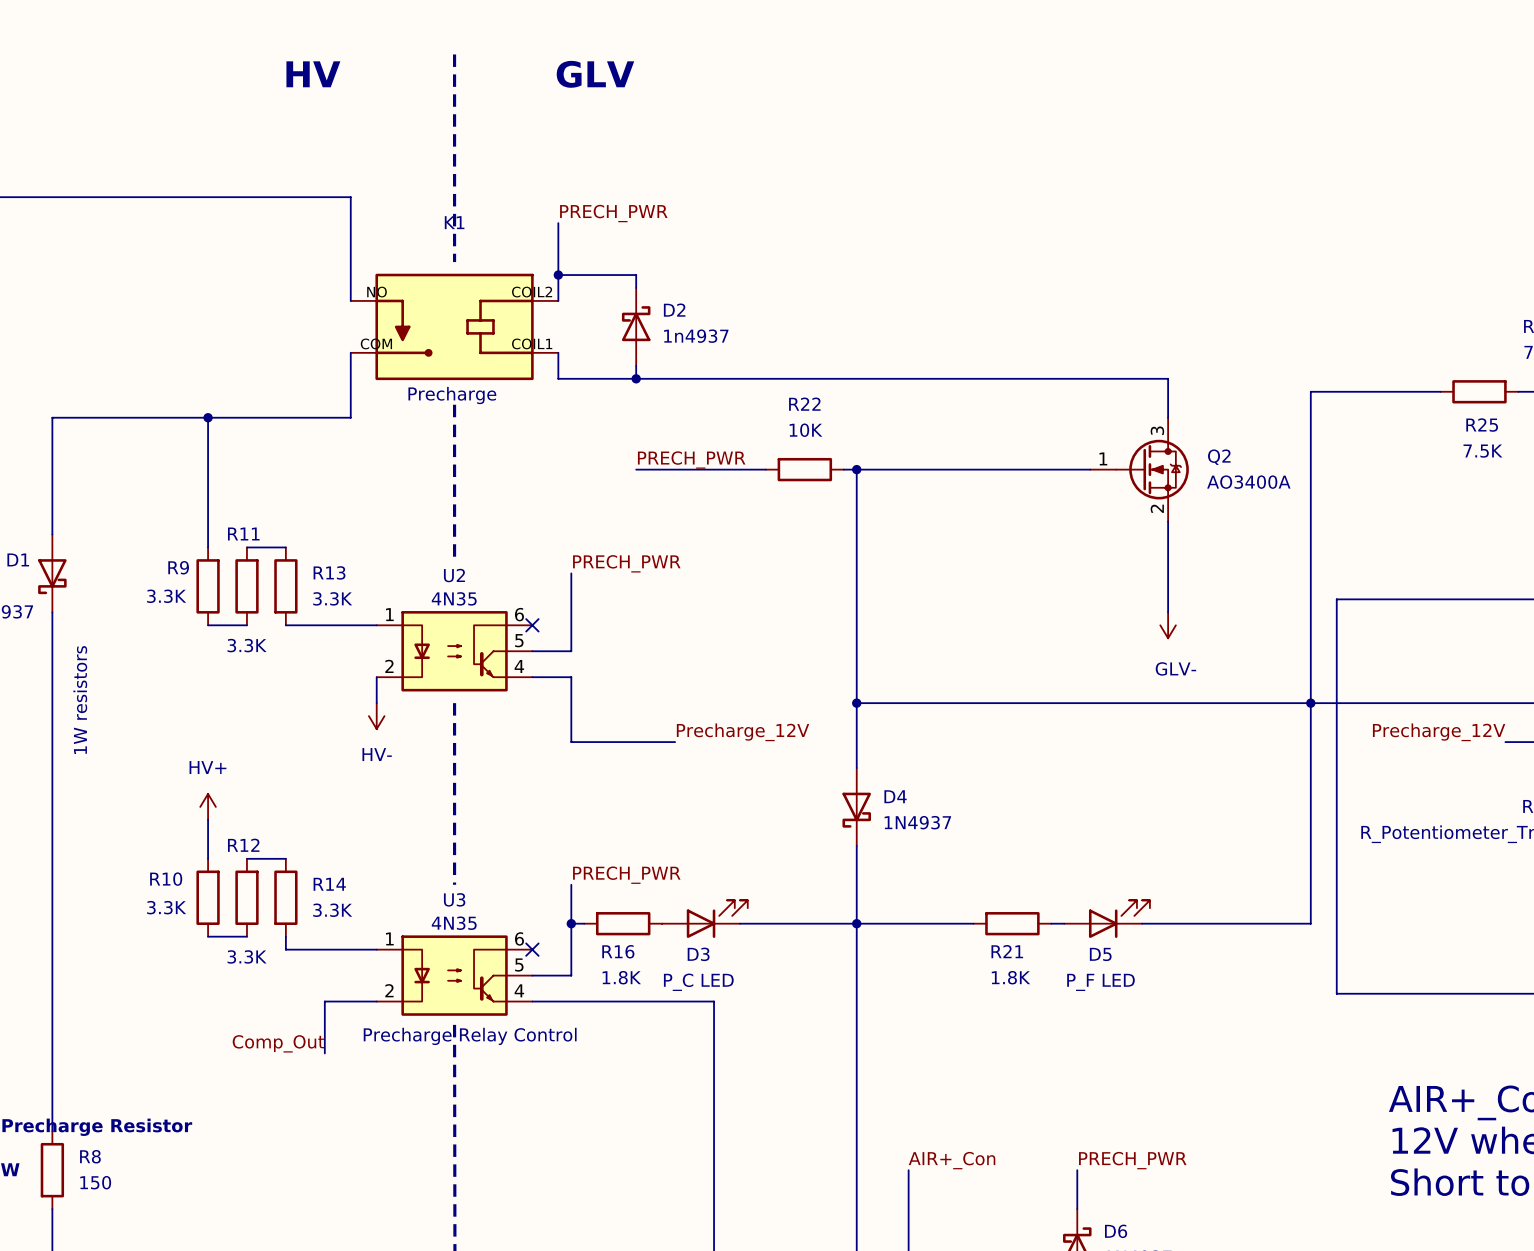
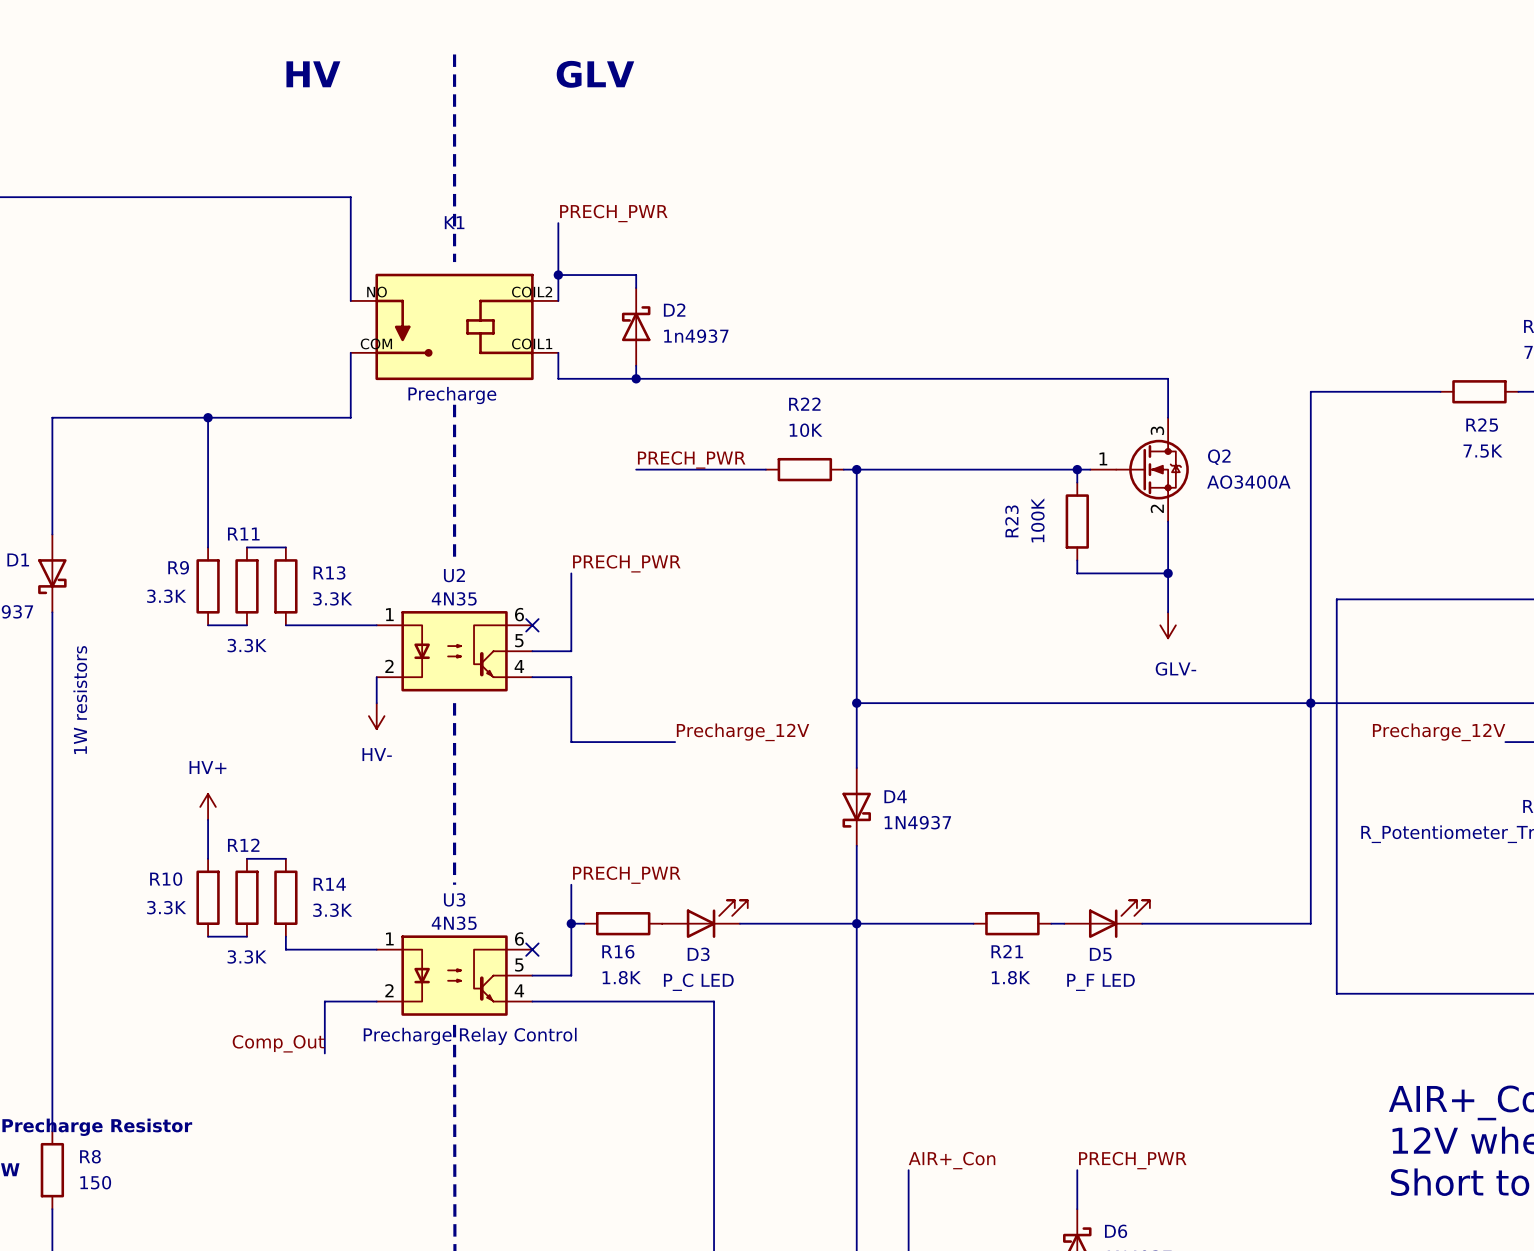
wire: none -> (1077, 469) (1077, 482)
junction: none -> (1077, 469)
R23: none -> 100K (1077, 521)
wire: none -> (1077, 560) (1077, 573) (1168, 573)
junction: none -> (1168, 573)

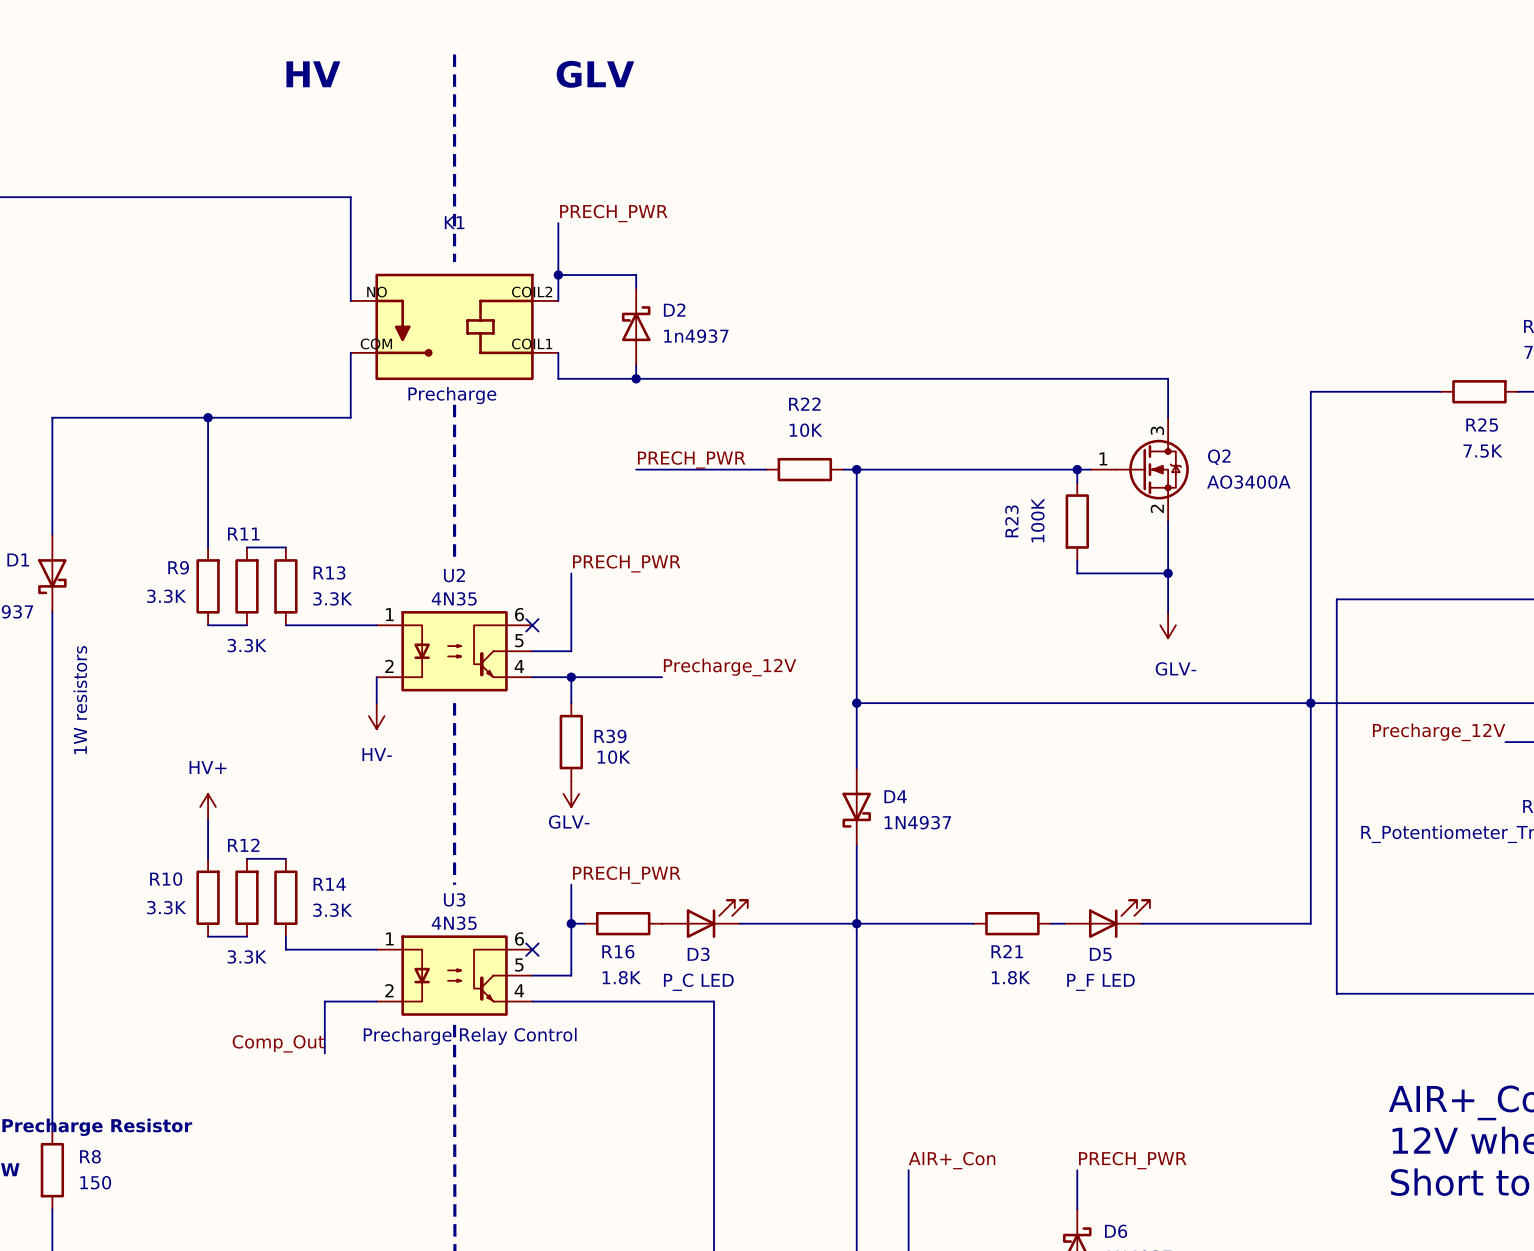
wire: none -> (571, 677) (662, 677)
junction: none -> (571, 677)
wire: (571, 703) (571, 742) (675, 742) -> none
label position: Precharge_12V (743, 732) -> Precharge_12V (730, 667)
R39: none -> 10K (571, 742)
power symbol: none -> GLV- (571, 793)

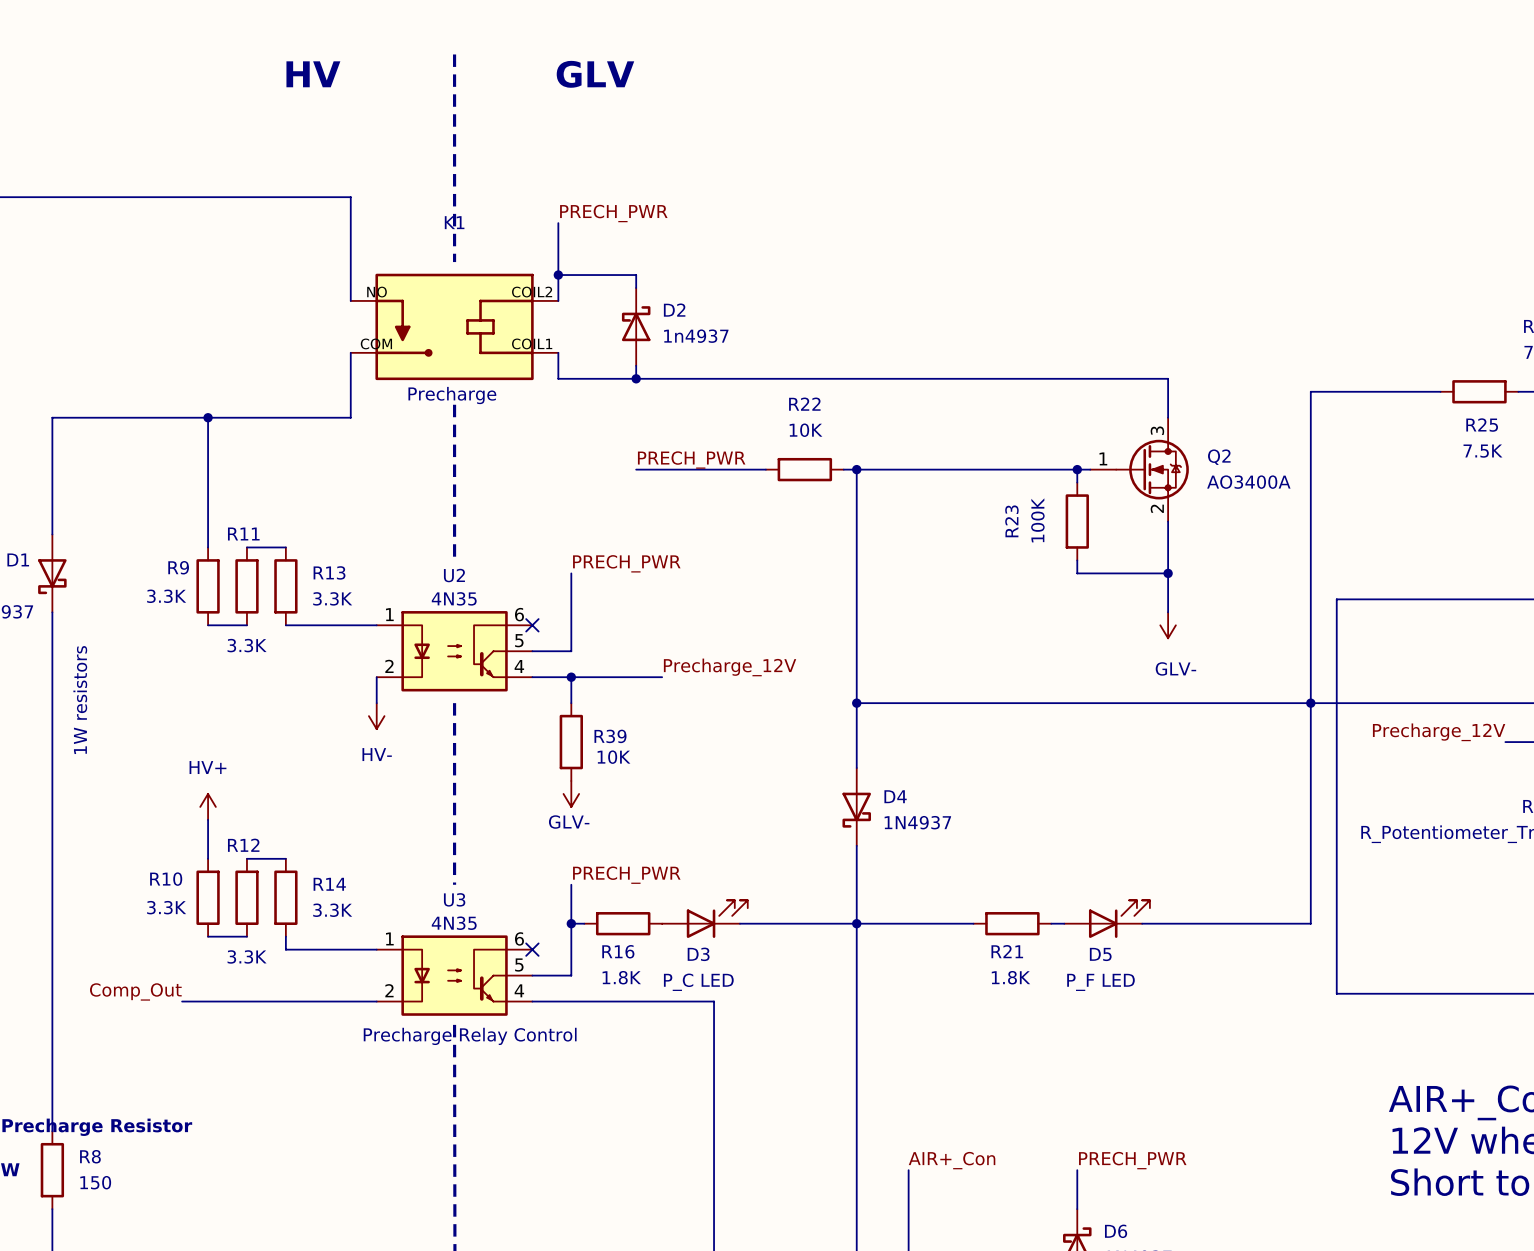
wire: (324, 1001) (324, 1053) -> (324, 1001) (182, 1001)
label position: Comp_Out (278, 1043) -> Comp_Out (135, 991)

